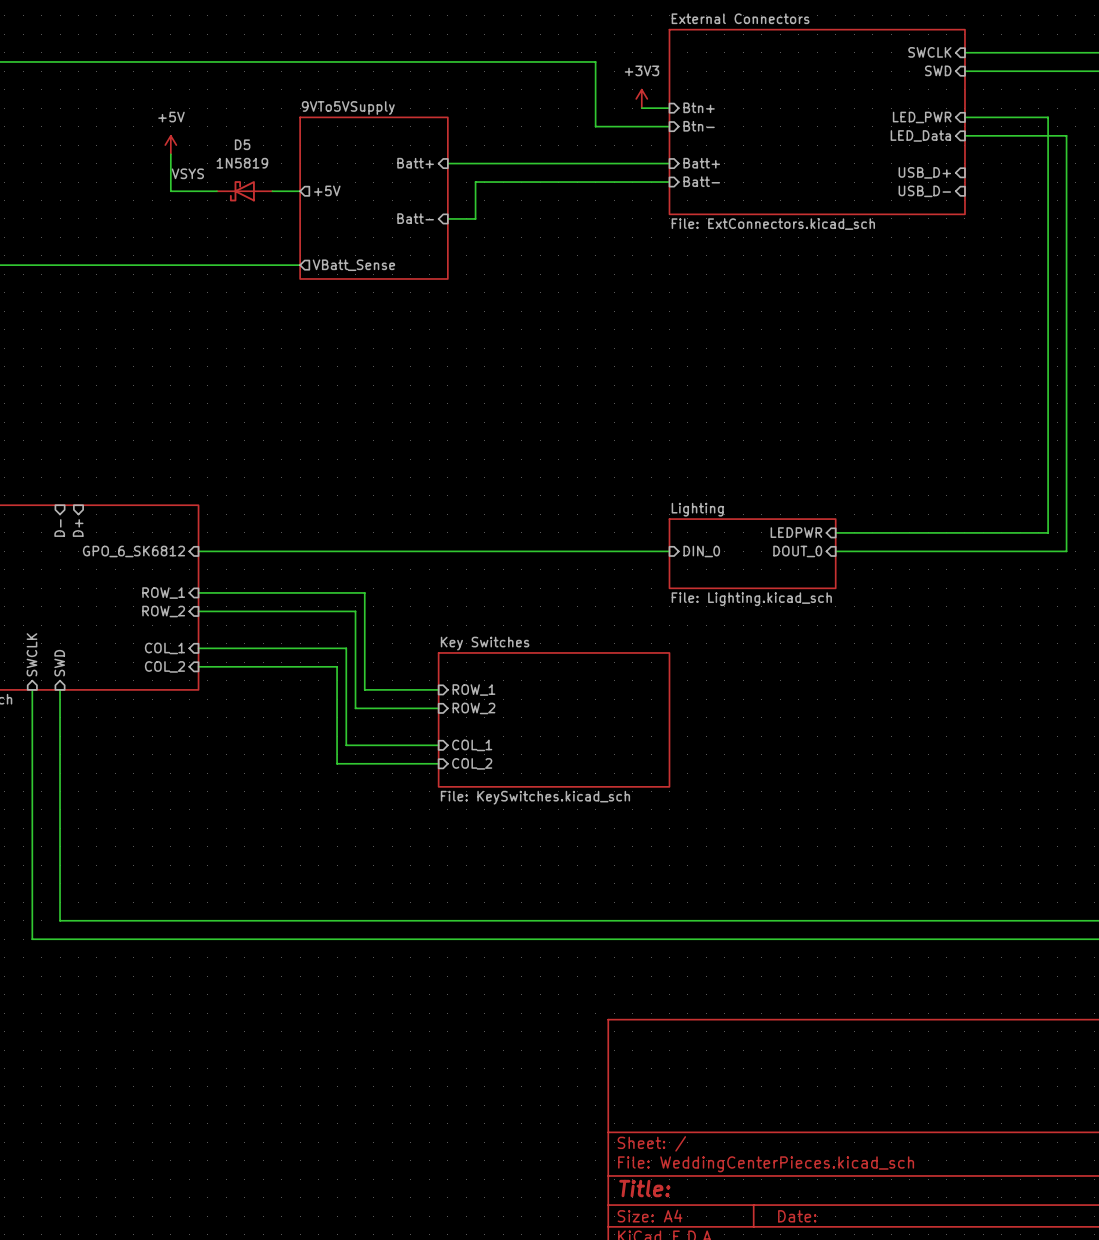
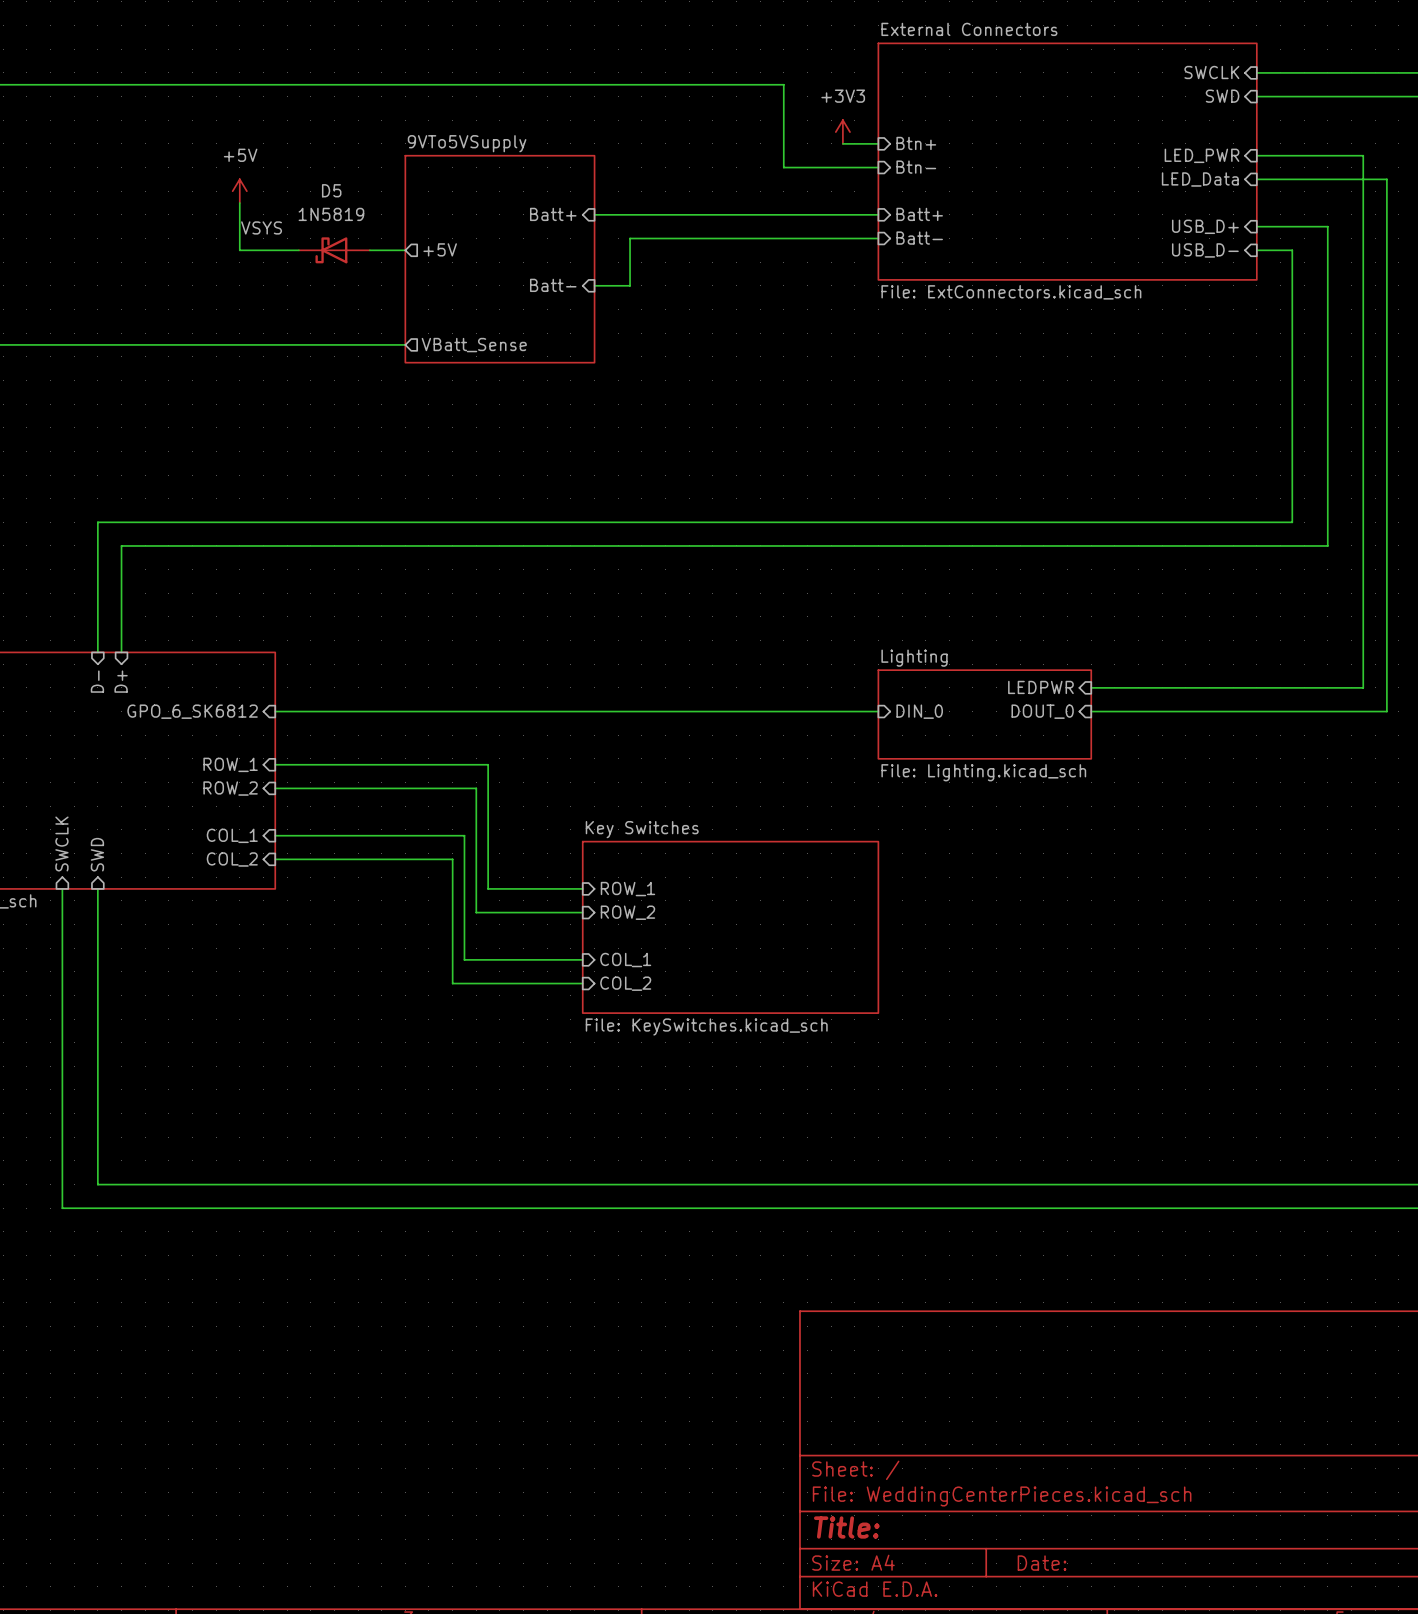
wire: none -> (1256, 226) (1327, 226) (1327, 545) (121, 545) (121, 652)
wire: none -> (1256, 250) (1292, 250) (1292, 522) (97, 522) (97, 652)

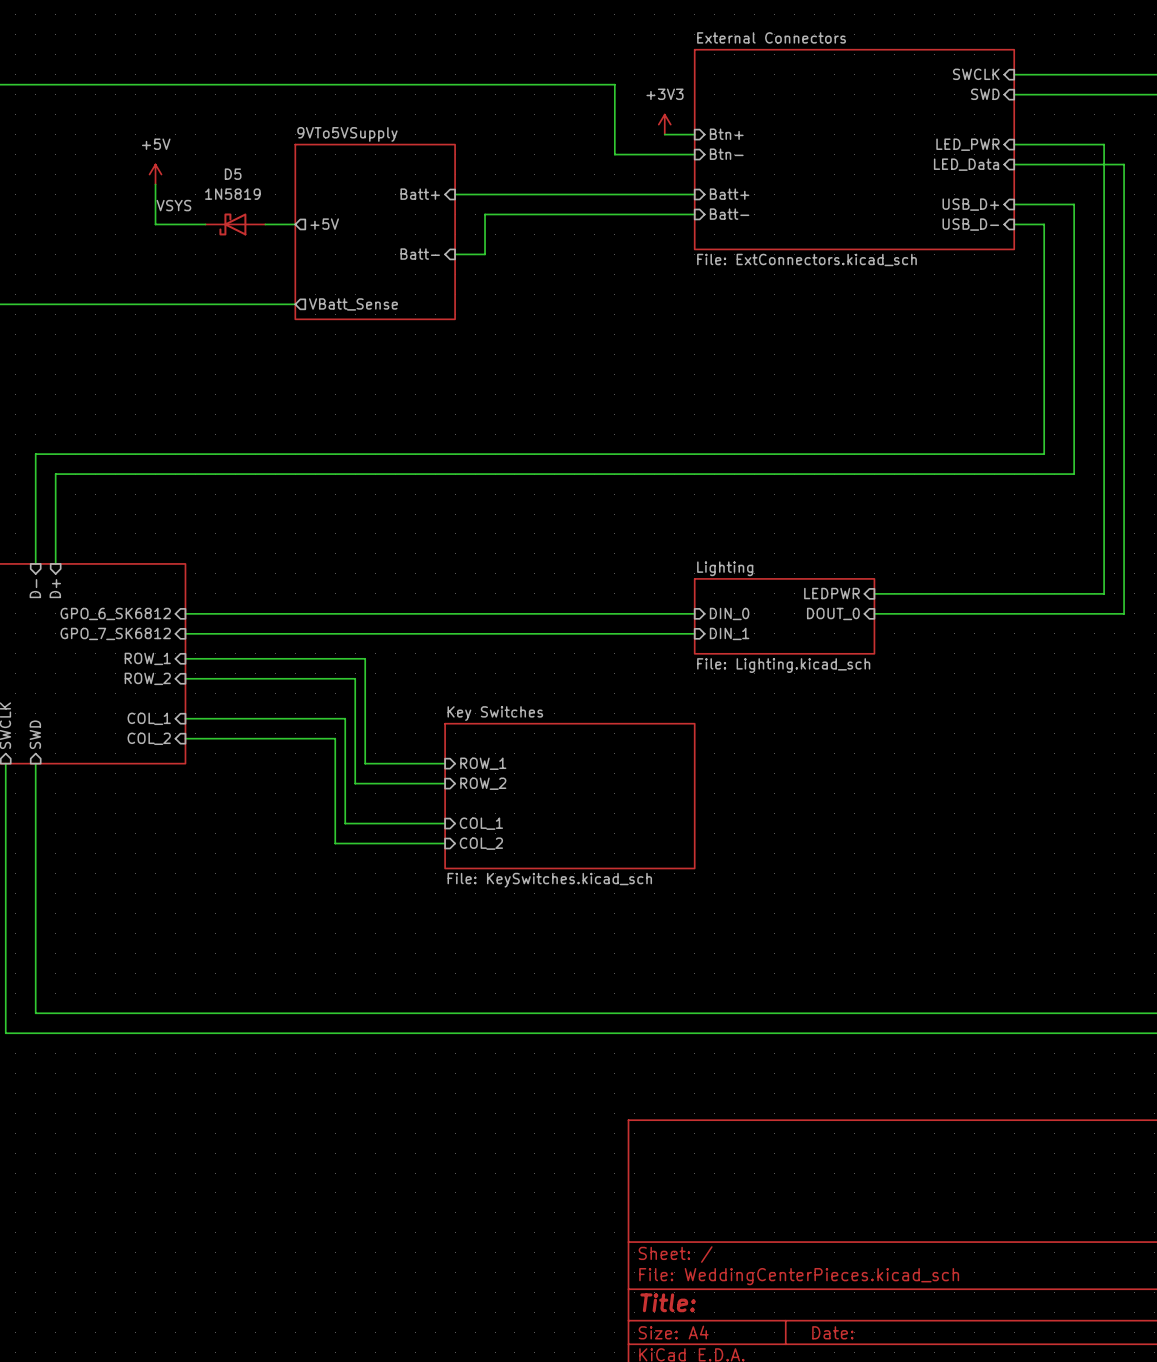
sheet pin: none -> GPO_7_SK6812 (115, 633)
wire: none -> (185, 633) (694, 633)
sheet pin: none -> DIN_1 (729, 633)

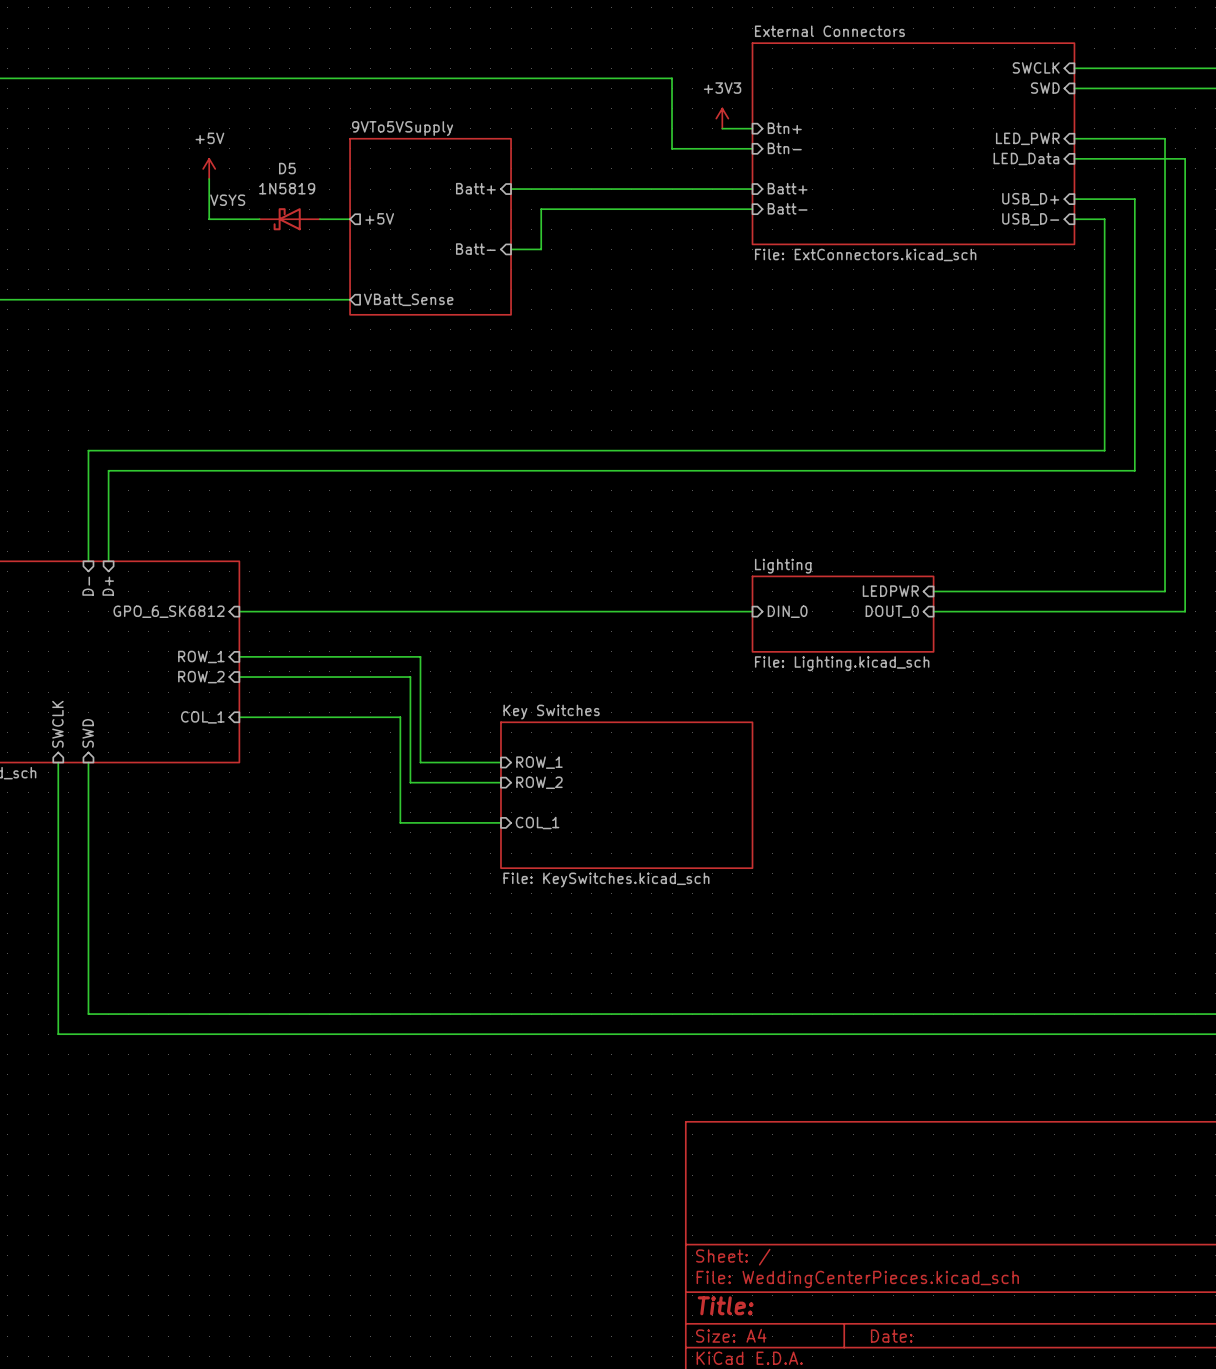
sheet pin: GPO_7_SK6812 (115, 633) -> none
wire: (185, 633) (694, 633) -> none
sheet pin: DIN_1 (729, 633) -> none
sheet pin: COL_2 (149, 738) -> none
wire: (185, 738) (335, 738) (335, 843) (445, 843) -> none
sheet pin: COL_2 (481, 843) -> none

